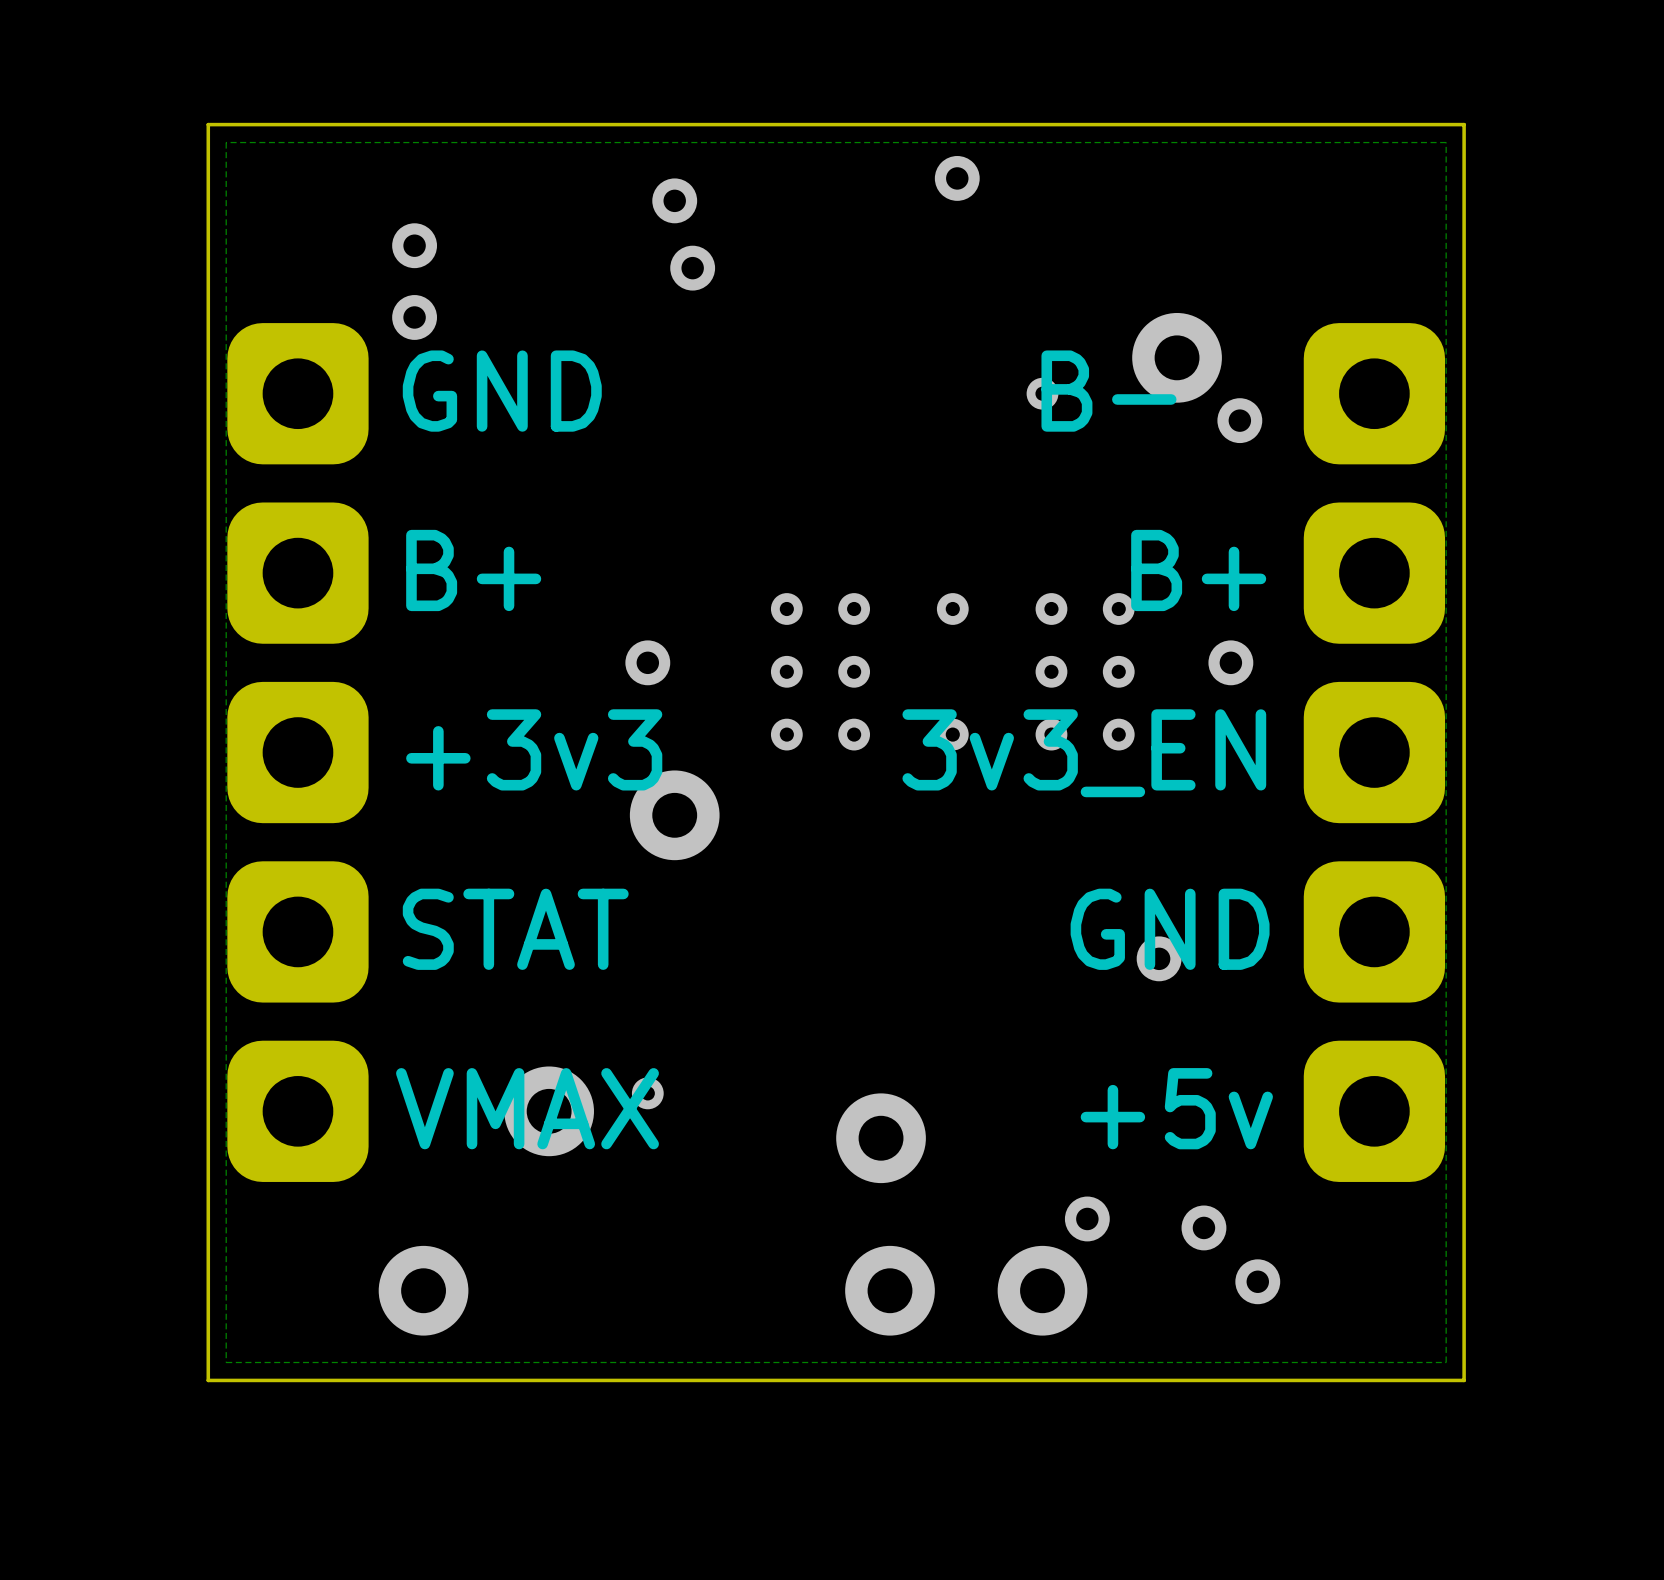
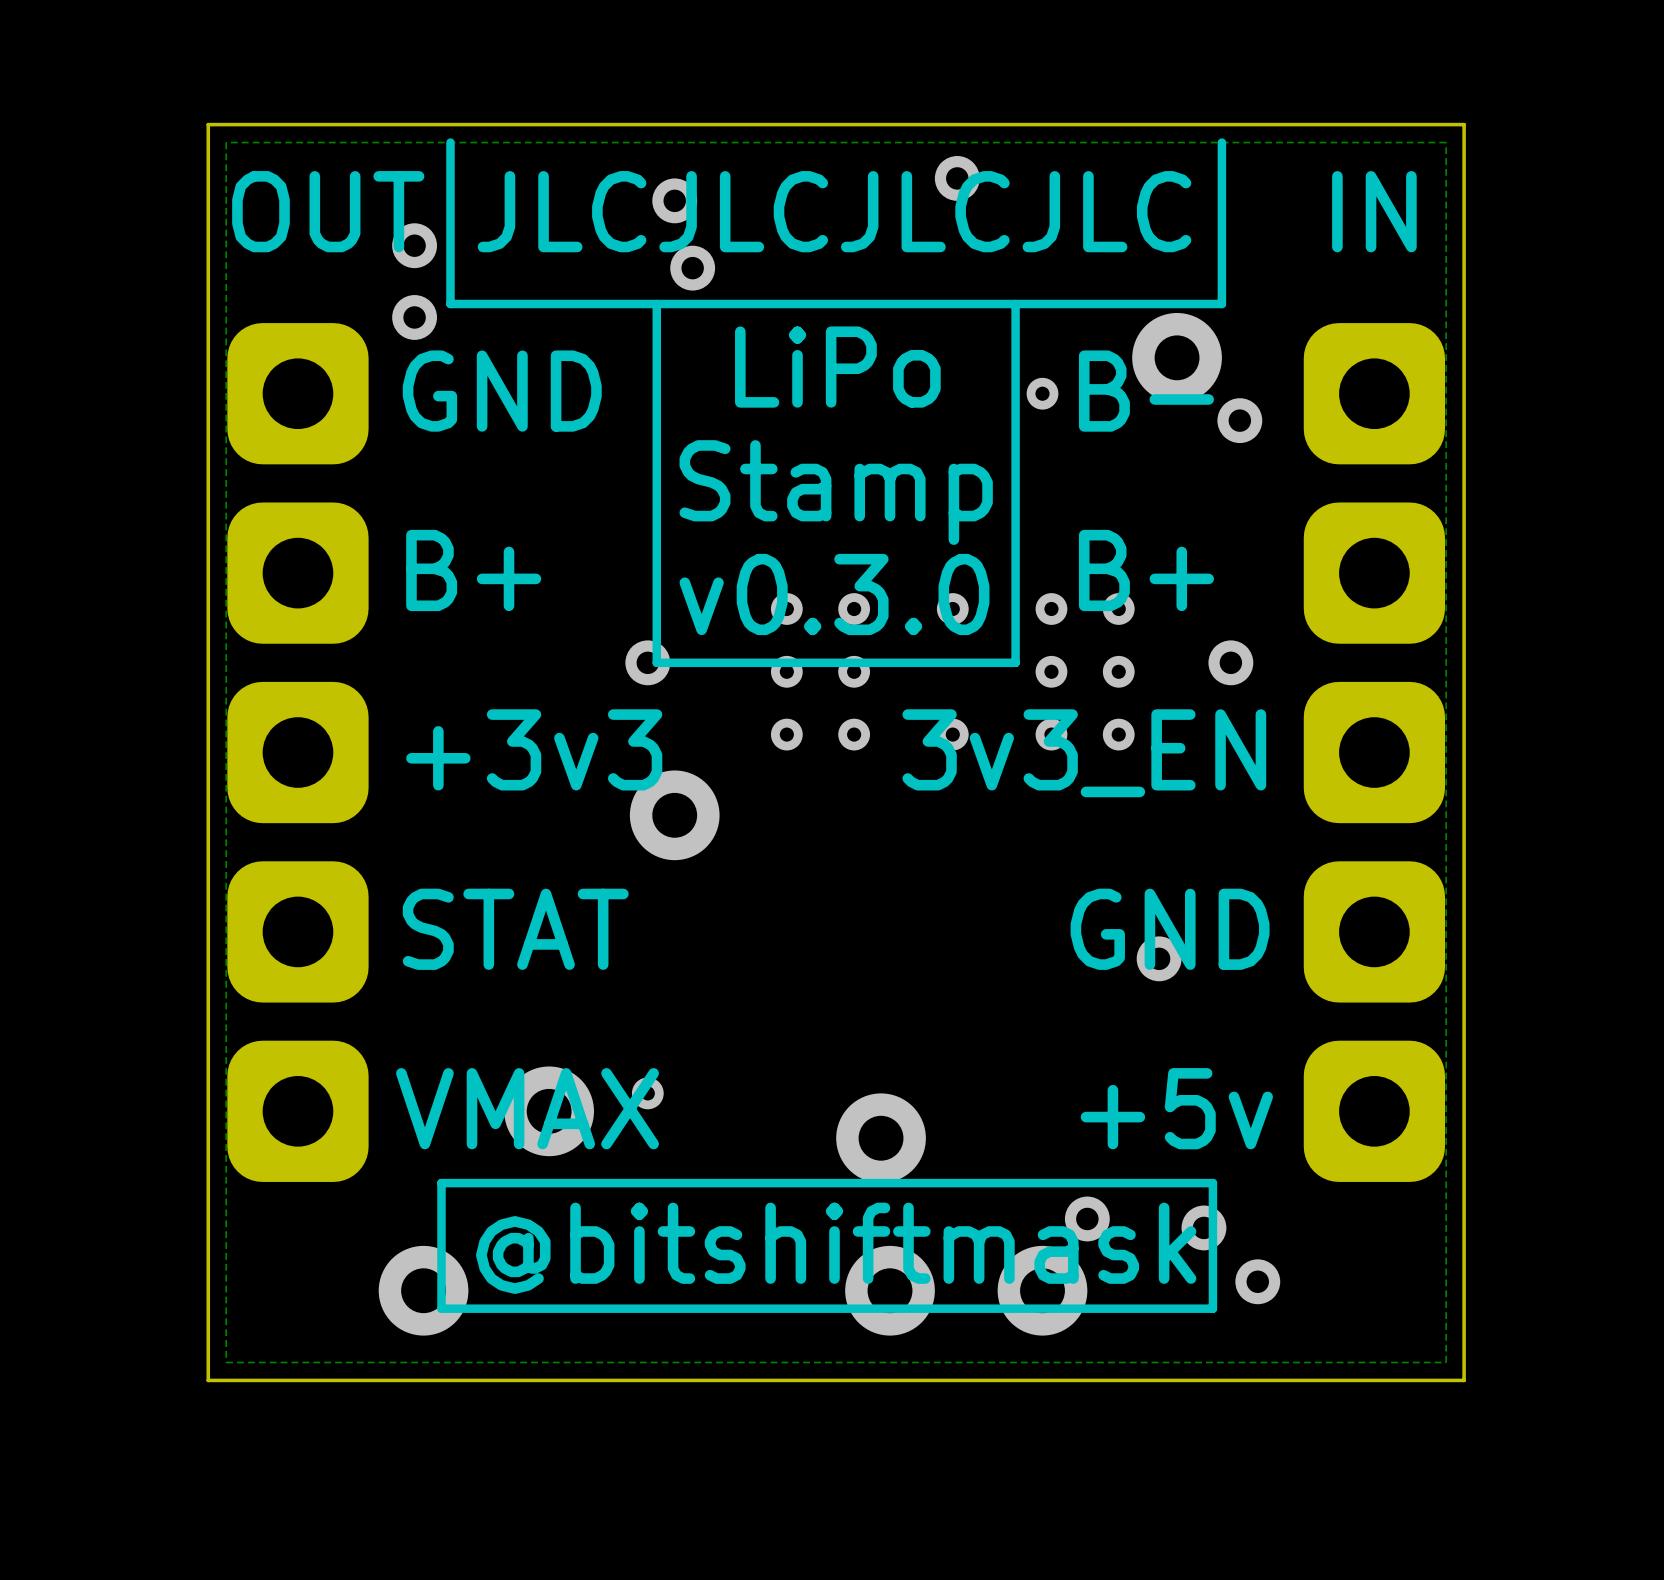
line: none -> (1221, 142) (1221, 304) (450, 304) (450, 142)
text: none -> OUT (328, 211)
text: none -> JLCJLCJLCJLC (834, 211)
text: none -> IN (1374, 211)
line: none -> (1015, 304) (1015, 662) (656, 662) (656, 304)
text: none -> LiPo (837, 367)
text position: B- (1108, 391) -> B- (1146, 391)
text: none -> Stamp (836, 492)
text position: B+ (1198, 570) -> B+ (1146, 570)
text: none -> v0.3.0 (834, 594)
line: none -> (1212, 1183) (441, 1183) (441, 1308) (1212, 1308) (1212, 1183)
text: none -> @bitshiftmask (836, 1248)

